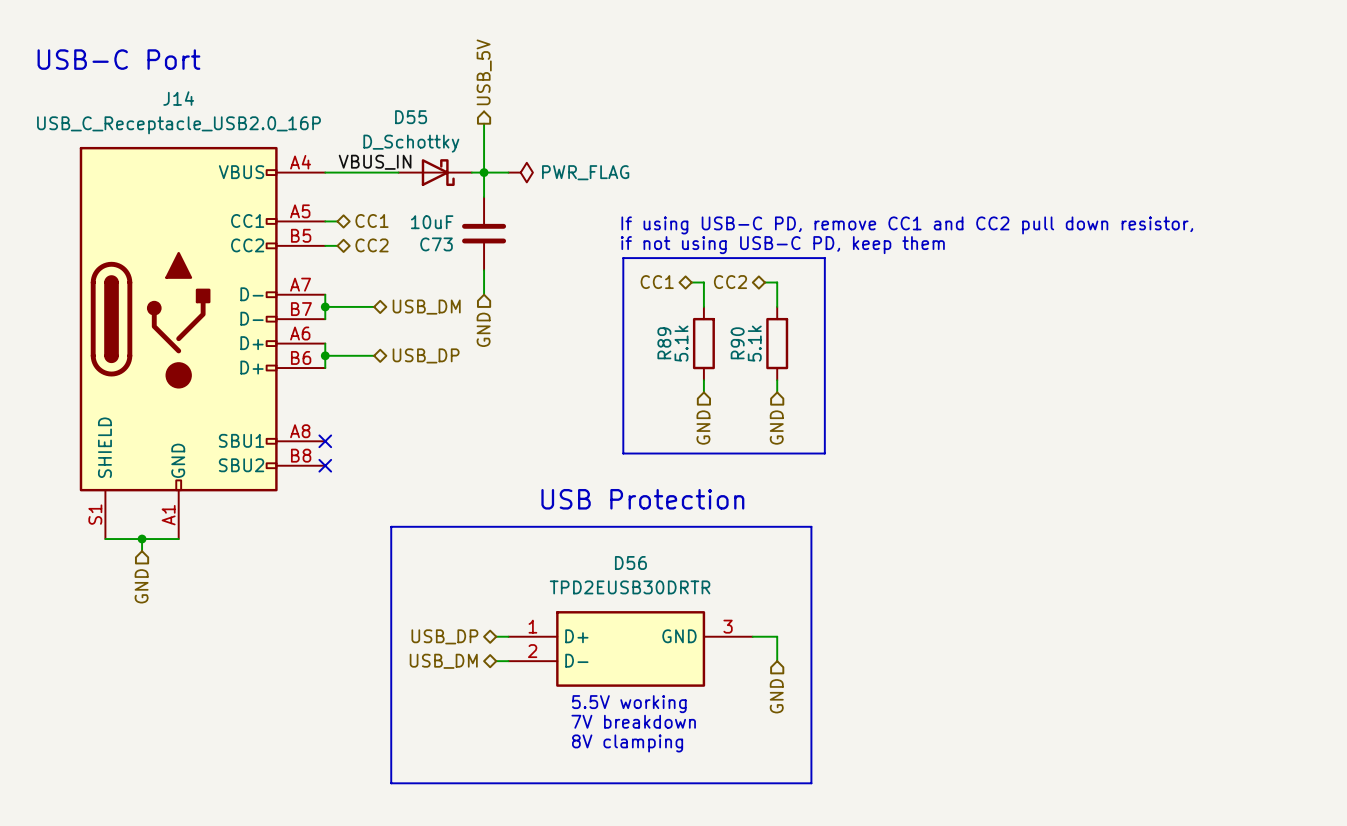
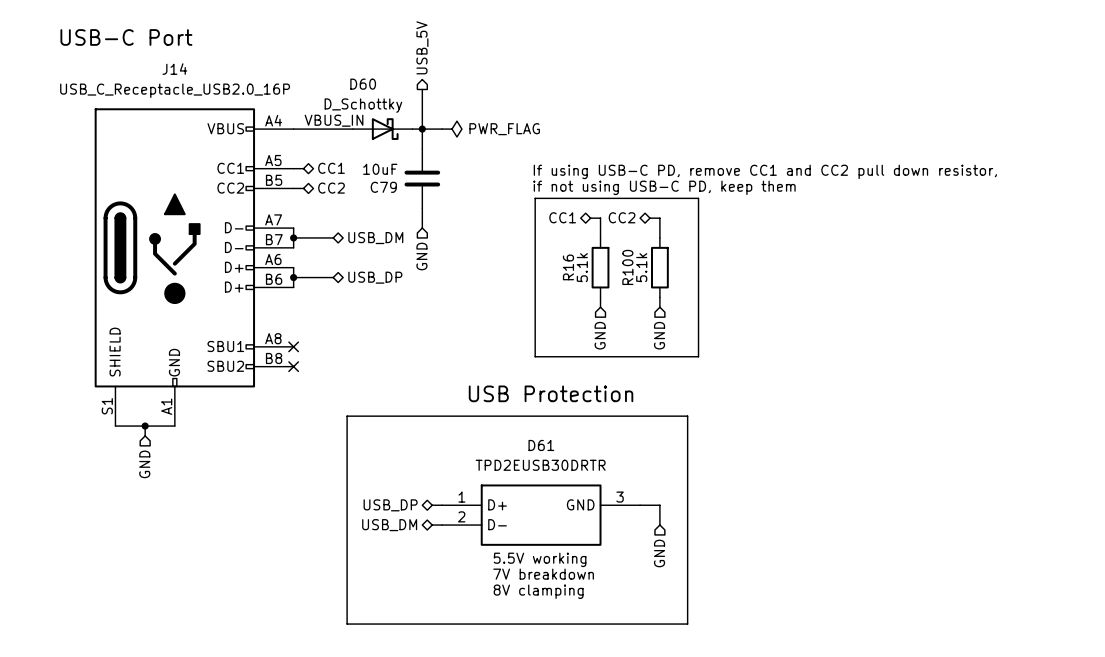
D55 name: D55 (411, 117) -> D60 (363, 84)
C73 name: C73 (436, 244) -> C79 (383, 187)
R89 name: R89 (664, 343) -> R16 (568, 267)
R90 name: R90 (737, 343) -> R100 (627, 267)
D56 name: D56 (630, 562) -> D61 (541, 445)

